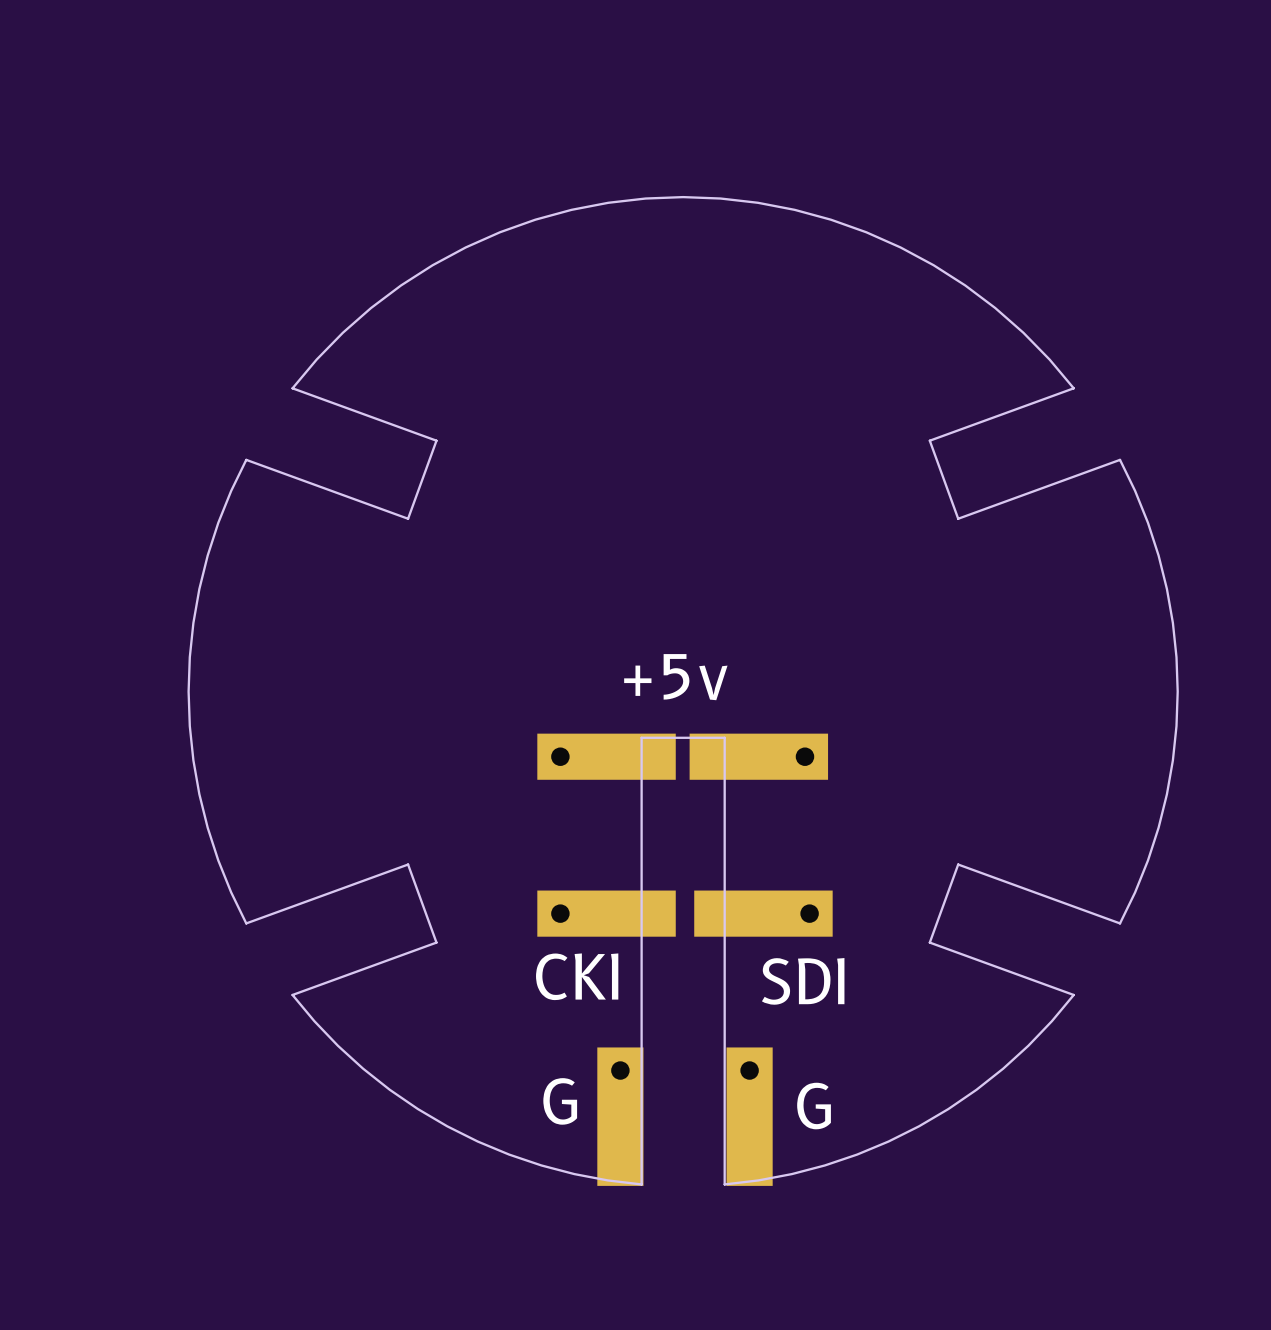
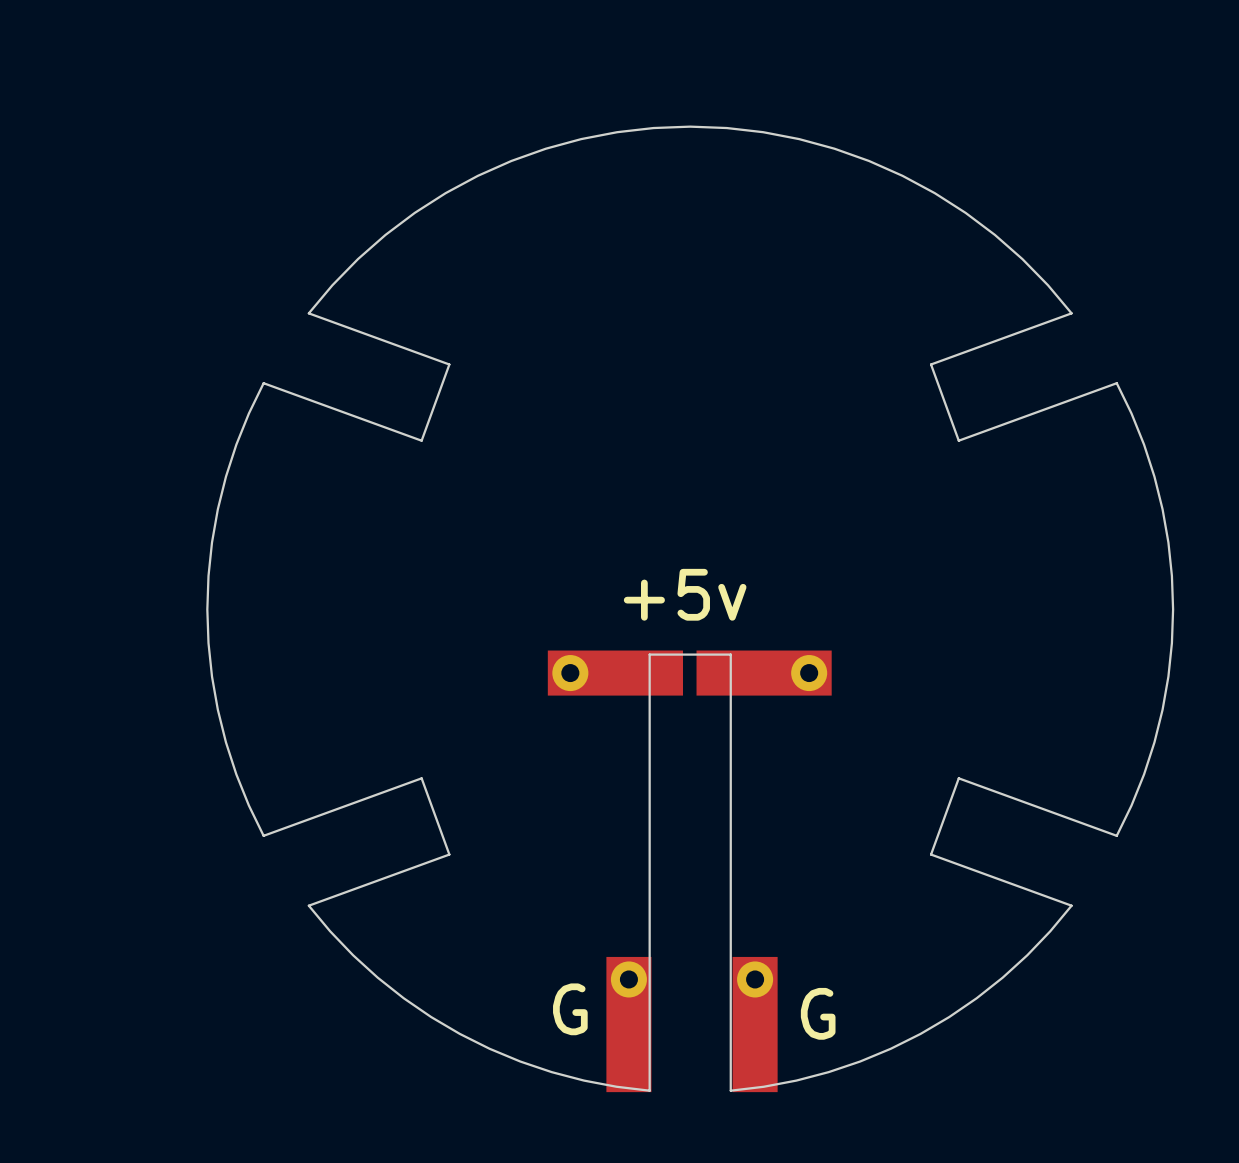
part: (606, 913) -> none
part: (763, 913) -> none
text: CKI (577, 976) -> none
text: SDI (803, 981) -> none

